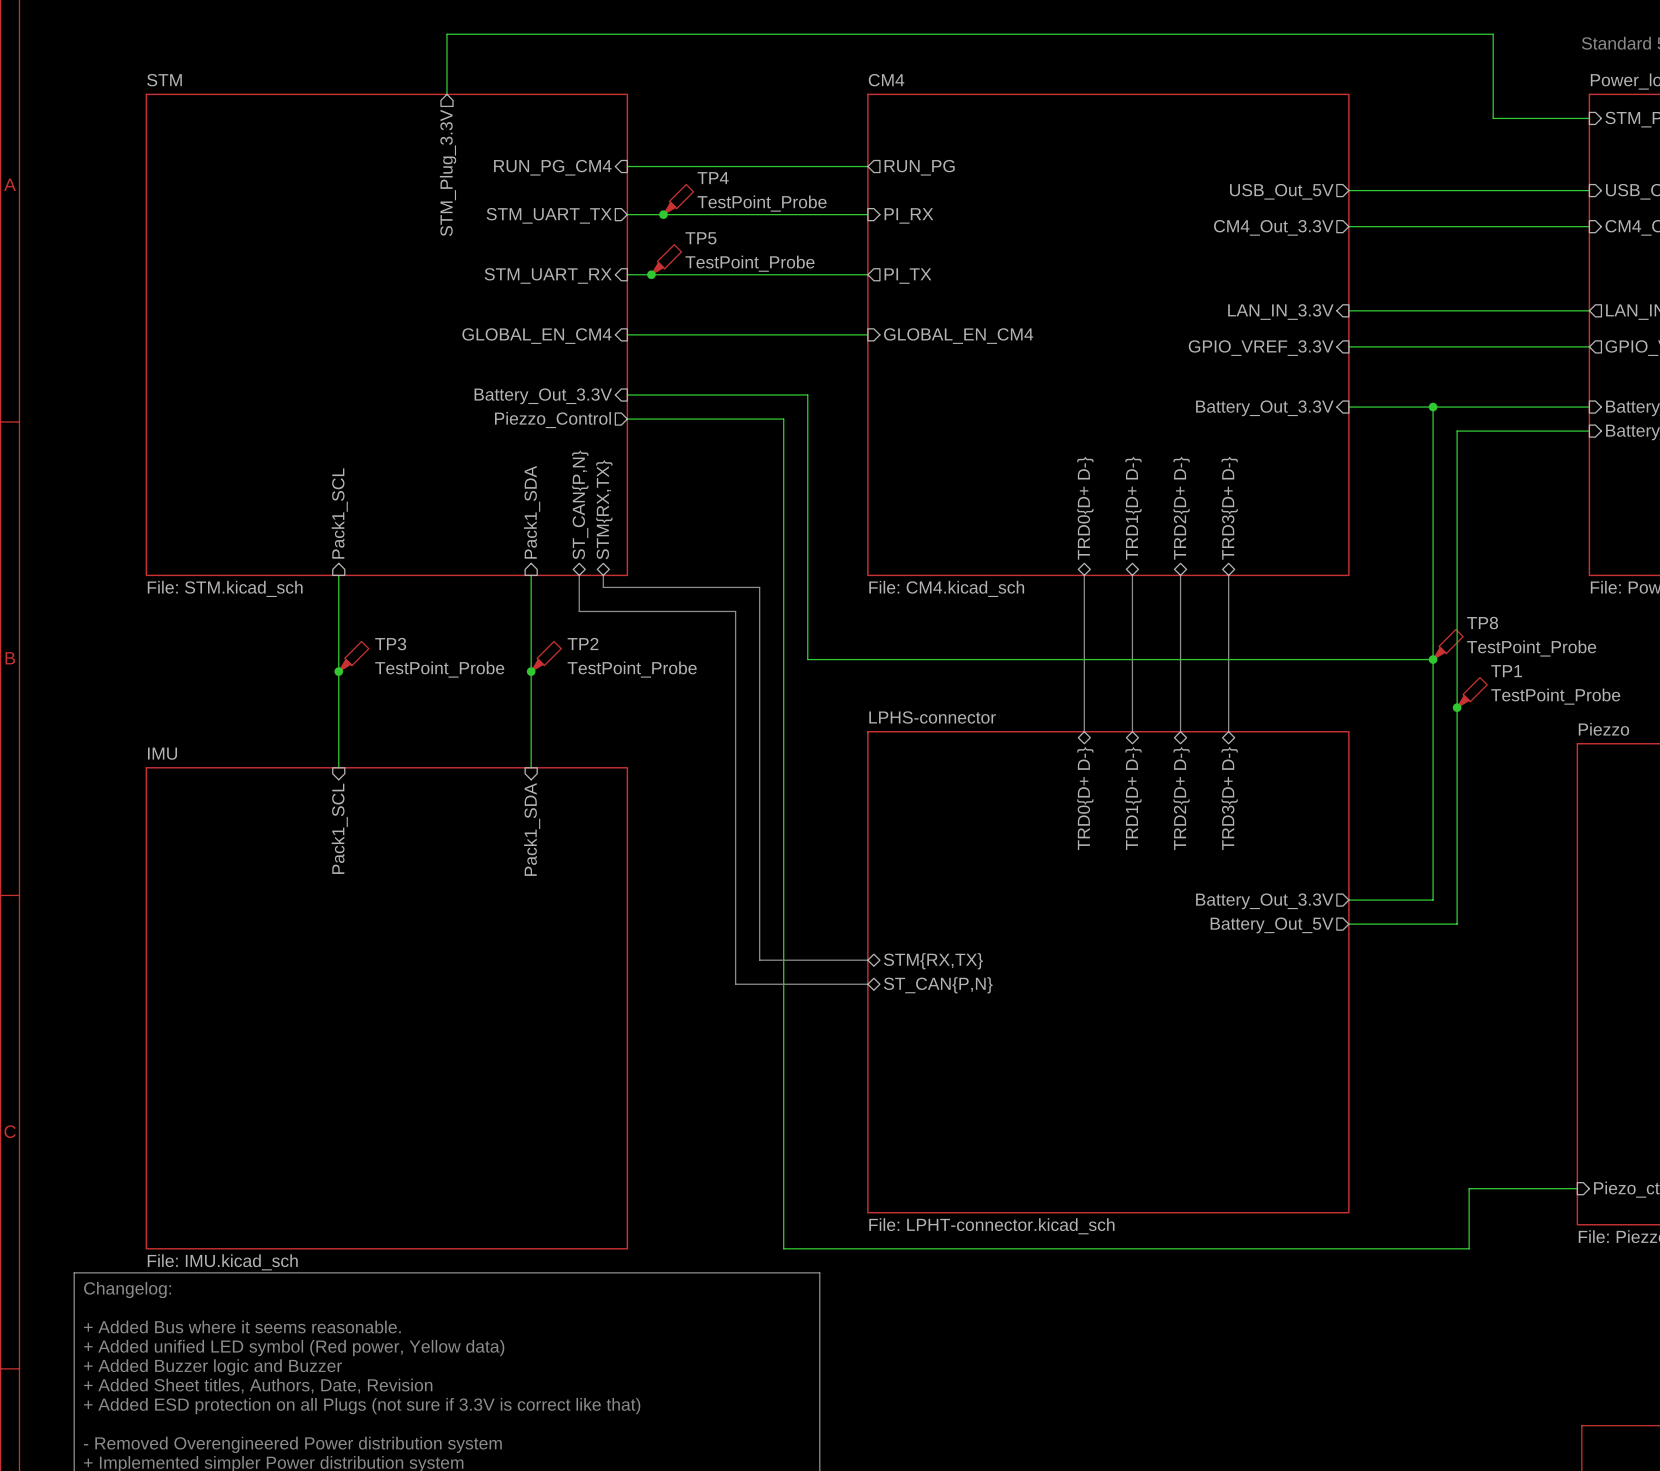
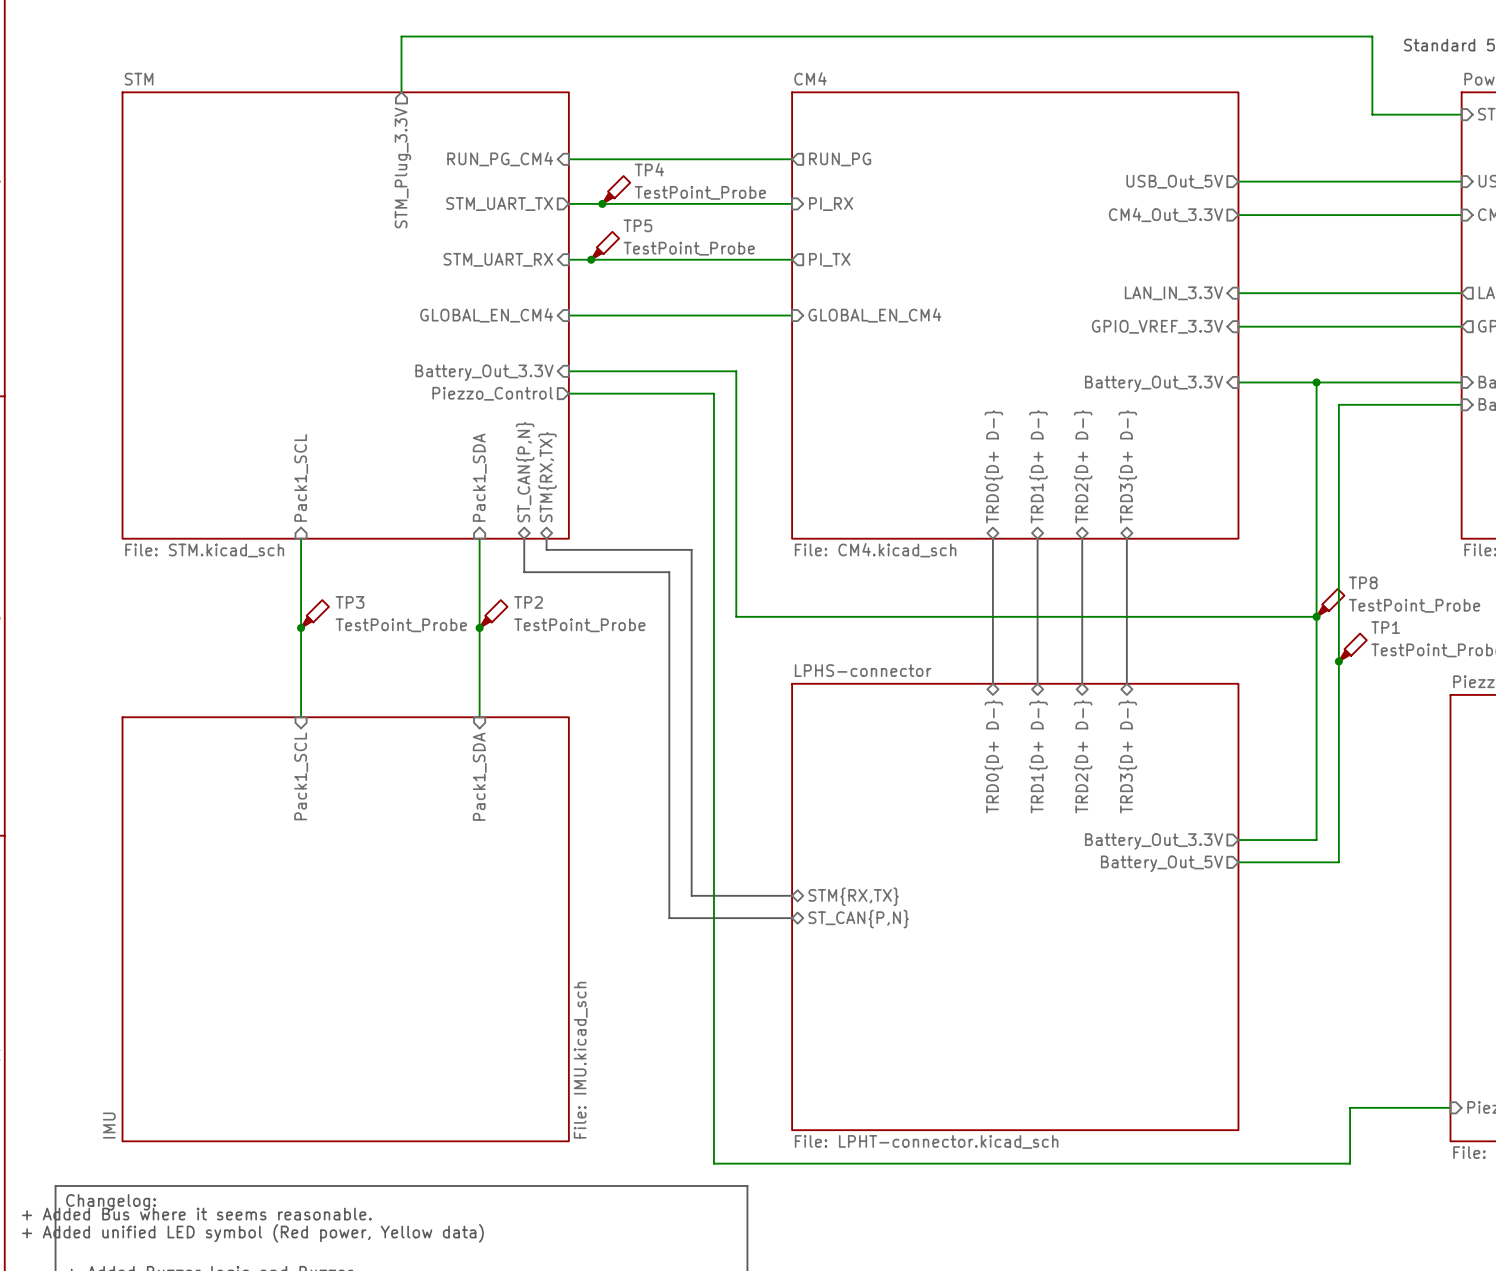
sheet IMU: none -> File: IMU.kicad_sch (345, 929)
sheet IMU: File: IMU.kicad_sch (386, 1008) -> none
text position: + Added Bus where it seems reasonable. (242, 1326) -> + Added Bus where it seems reasonable. (196, 1214)
text position: + Added unified LED symbol (Red power, Yellow data) (294, 1348) -> + Added unified LED symbol (Red power, Yellow data) (252, 1233)

